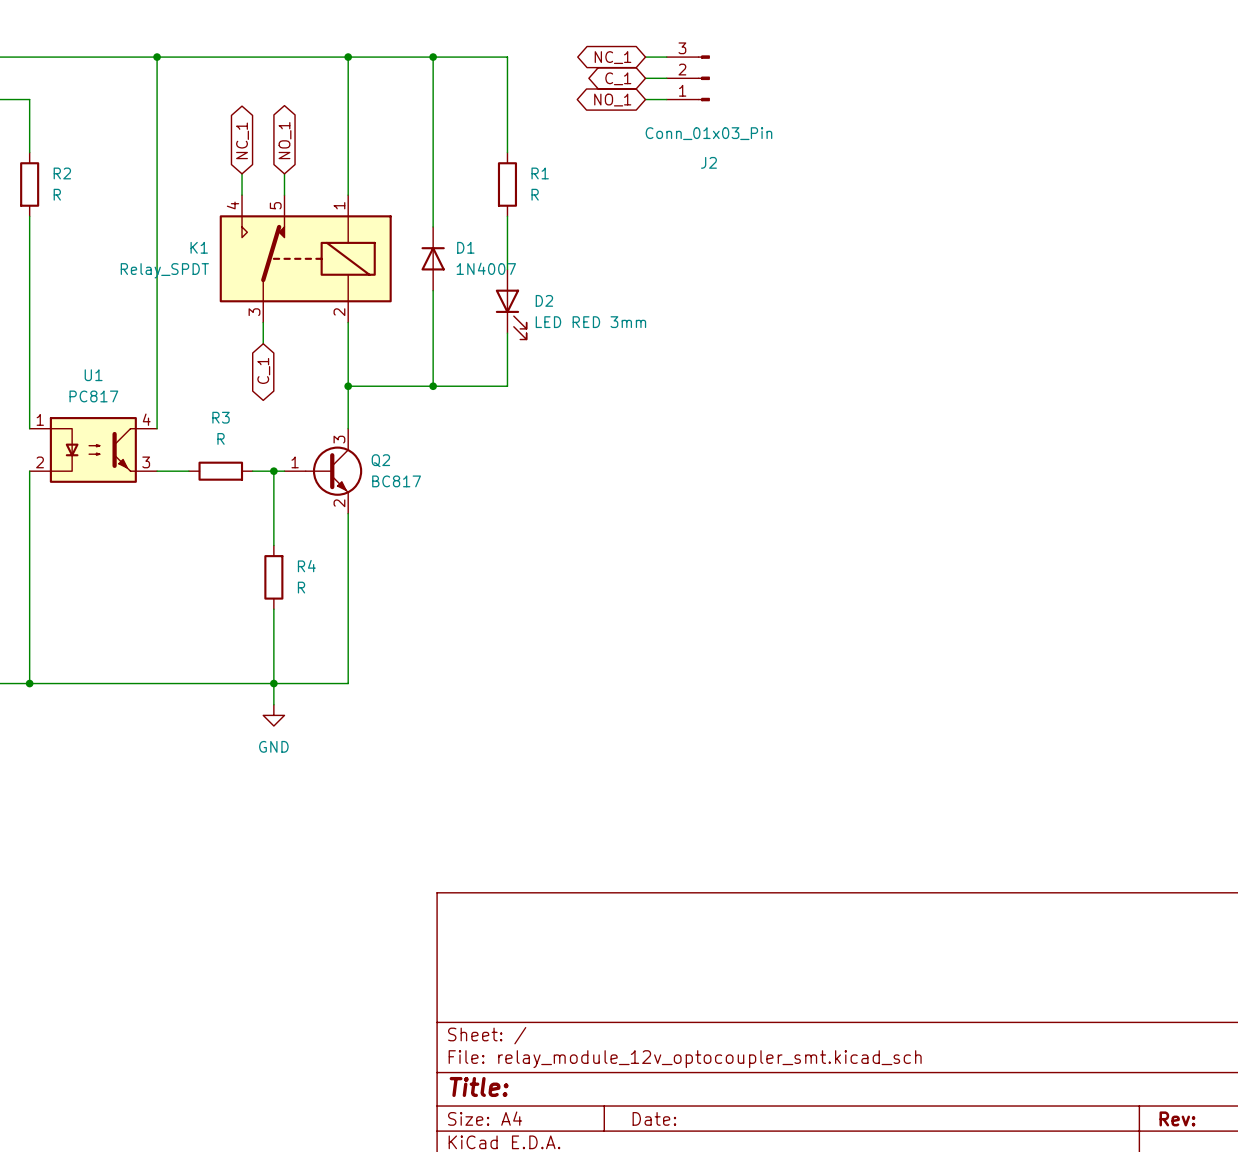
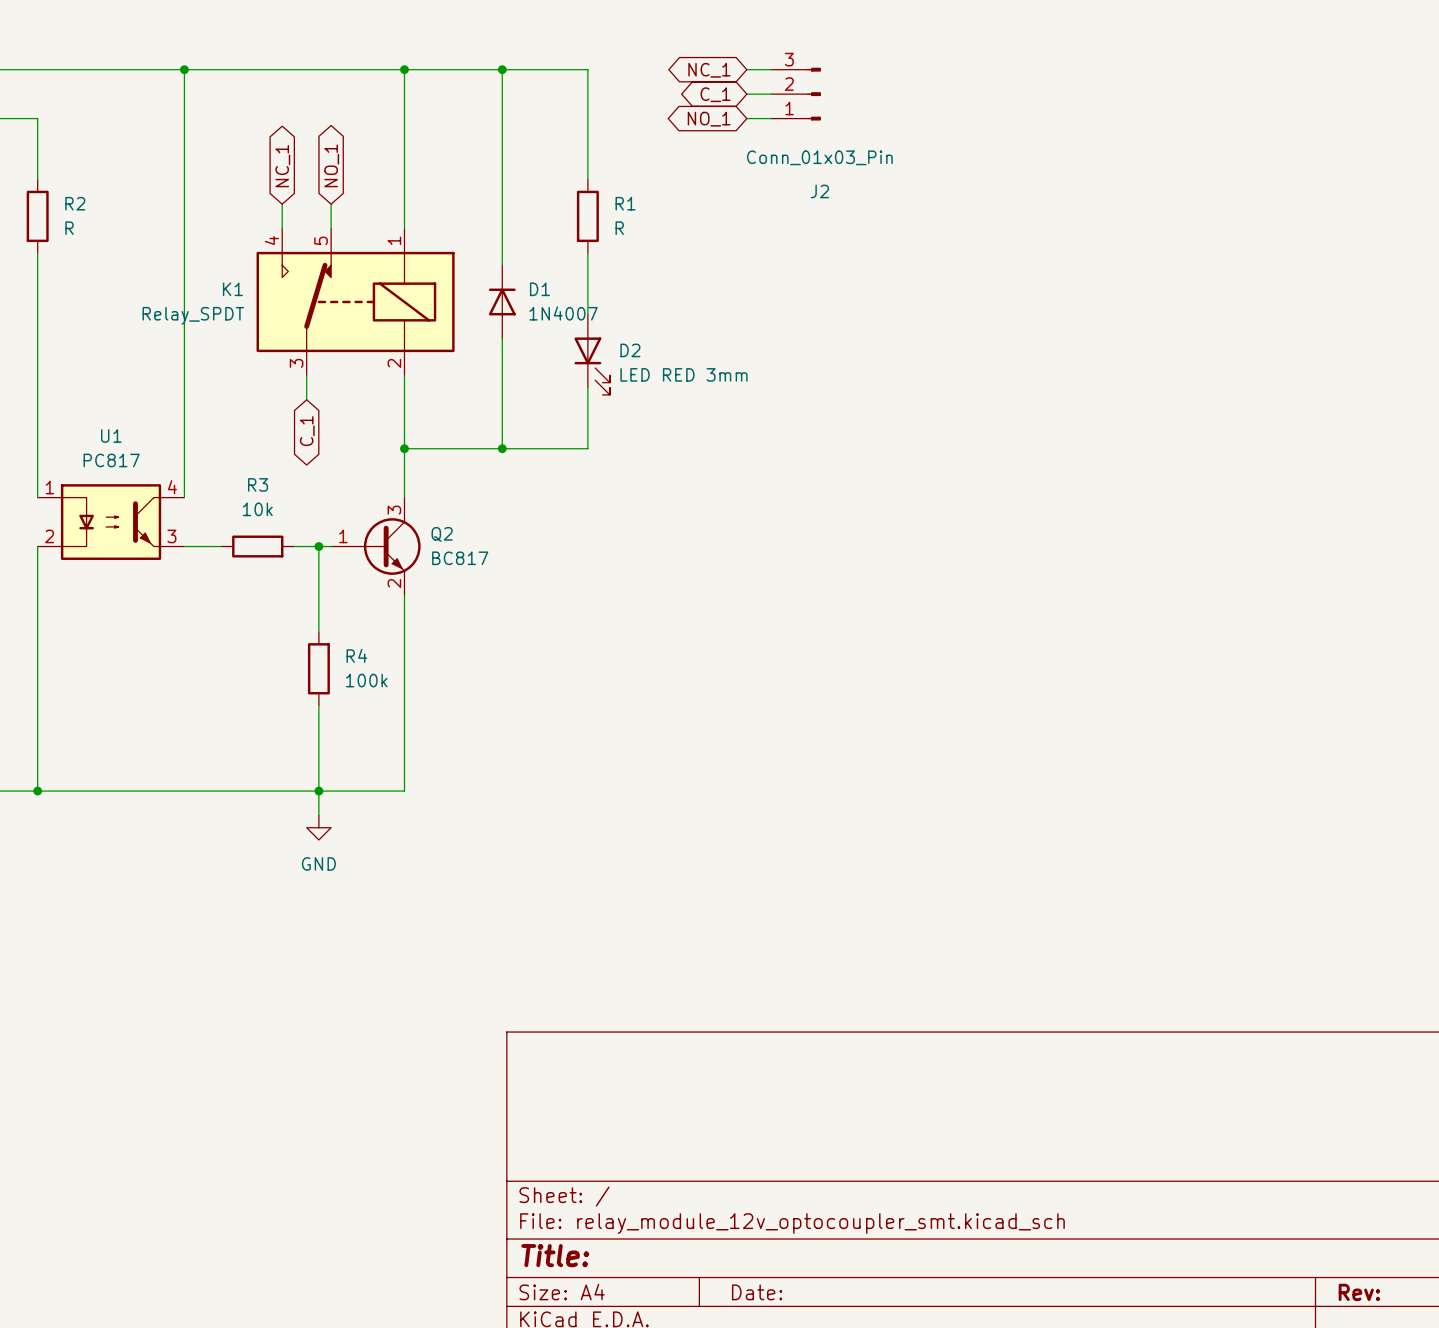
R3 value: R (221, 438) -> 10k (257, 509)
R4 value: R (301, 587) -> 100k (366, 680)

